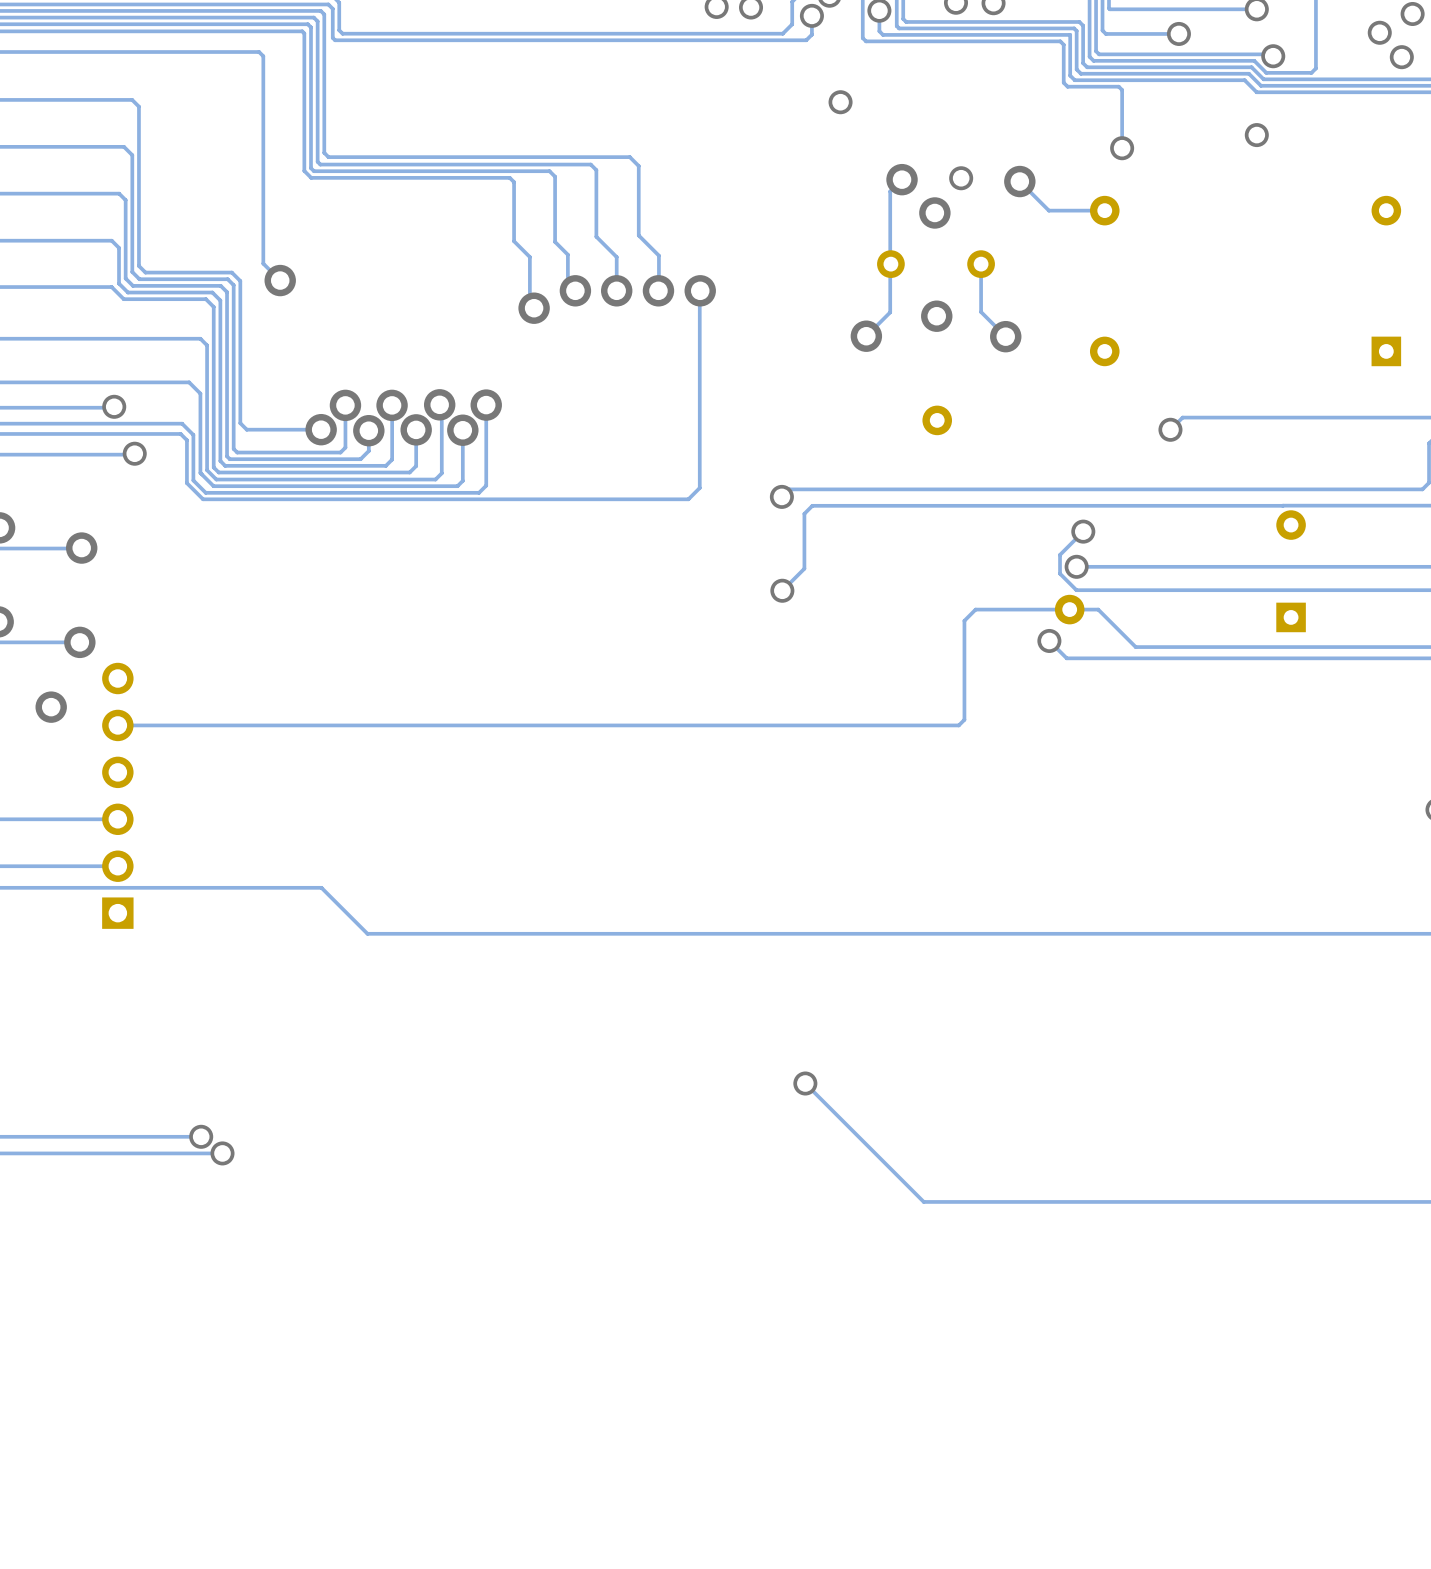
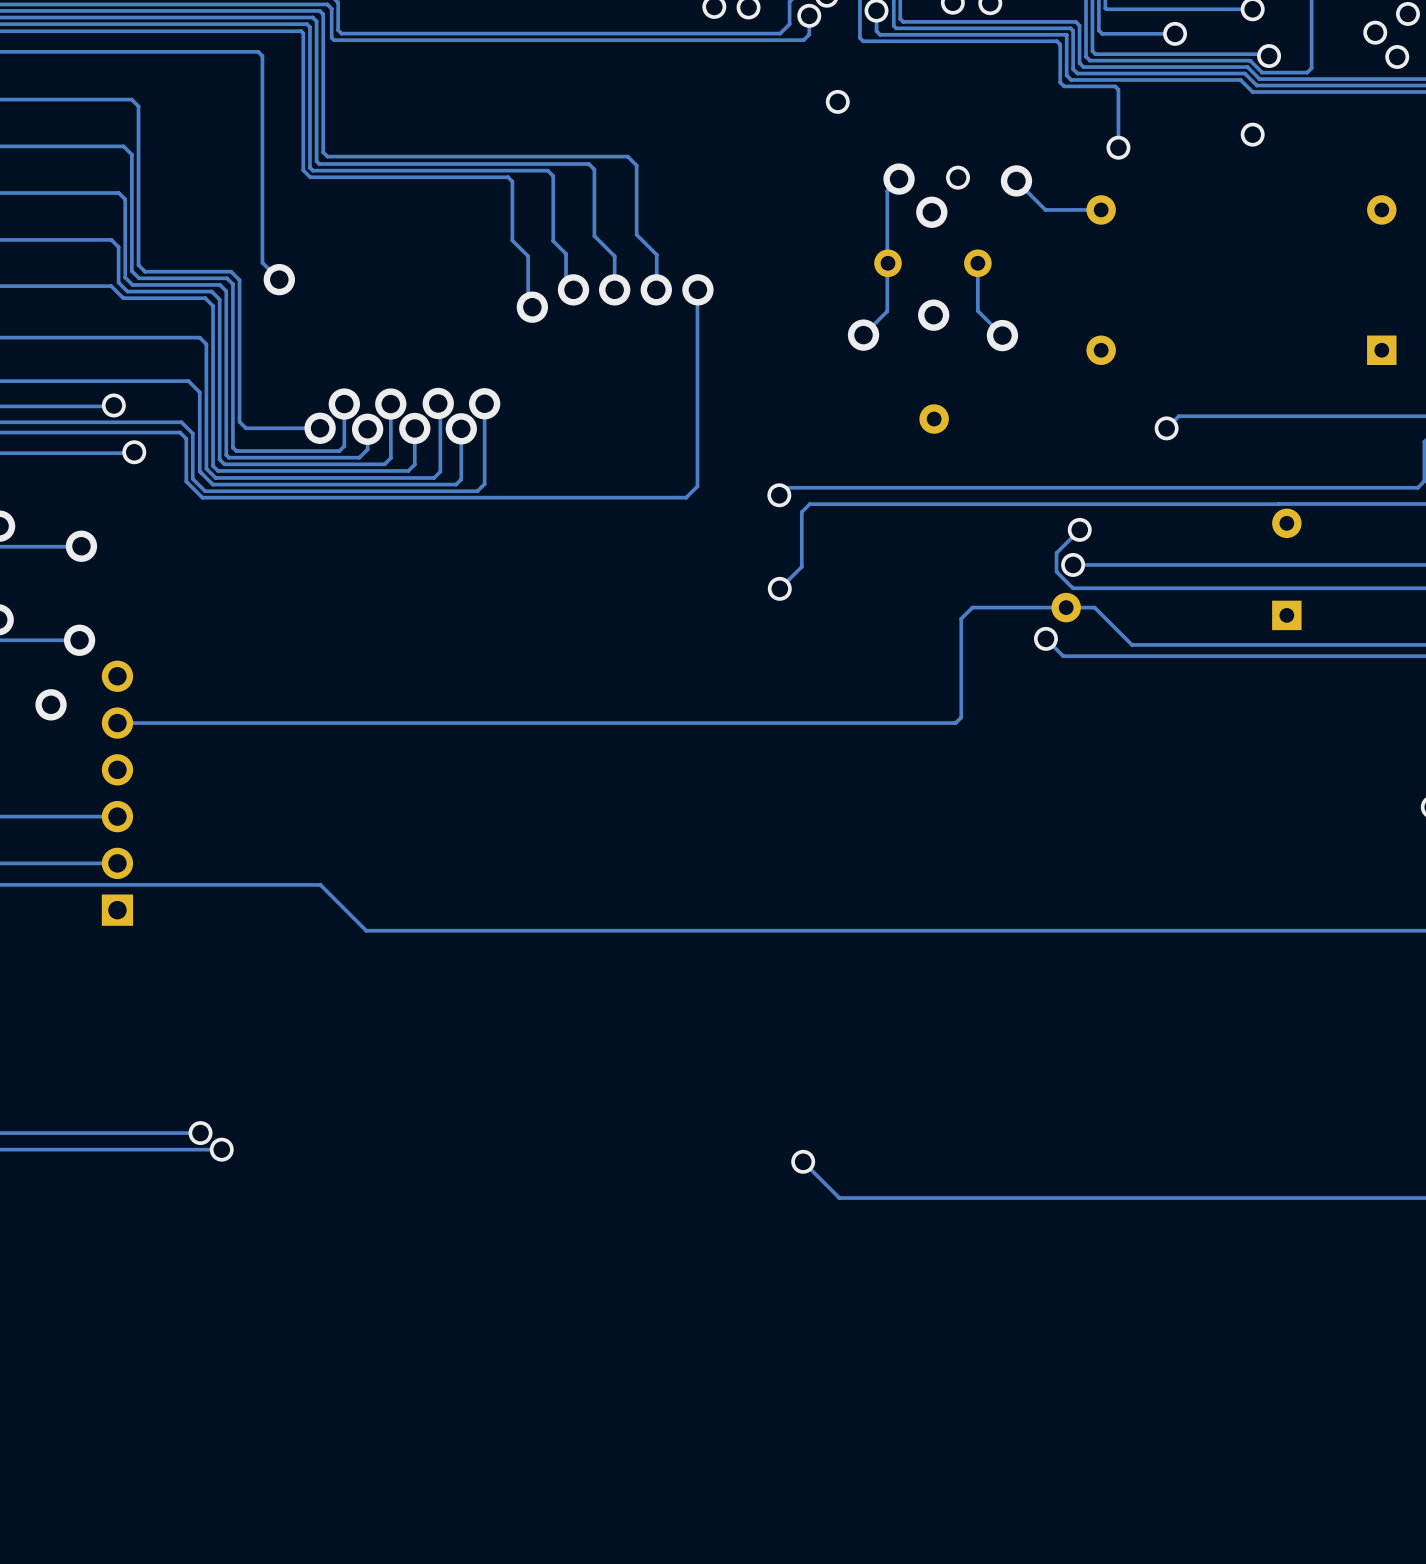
track: (805, 1083) (923, 1201) -> (803, 1161) (839, 1198) (920, 1198)
via position: (805, 1083) -> (803, 1161)

